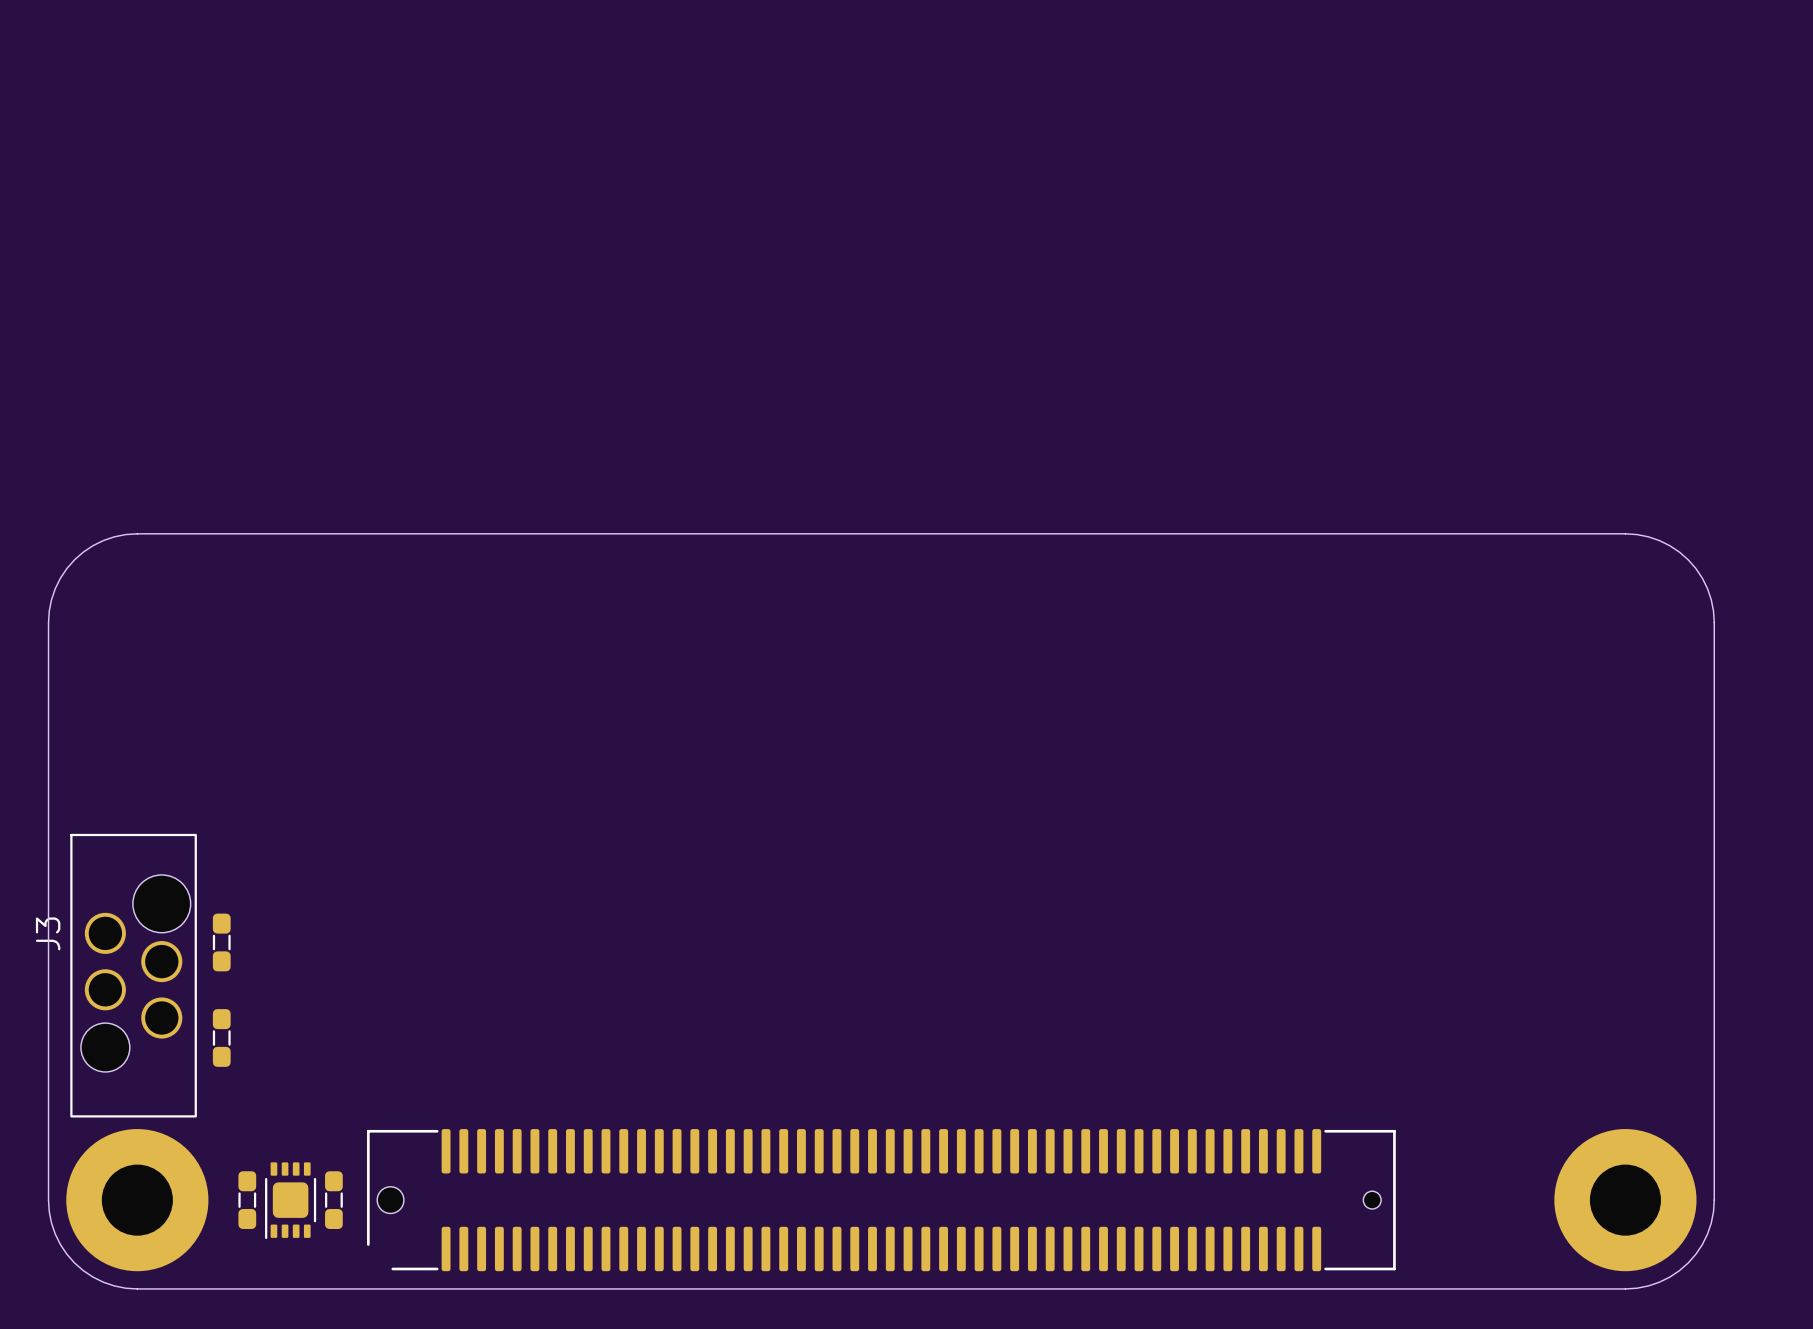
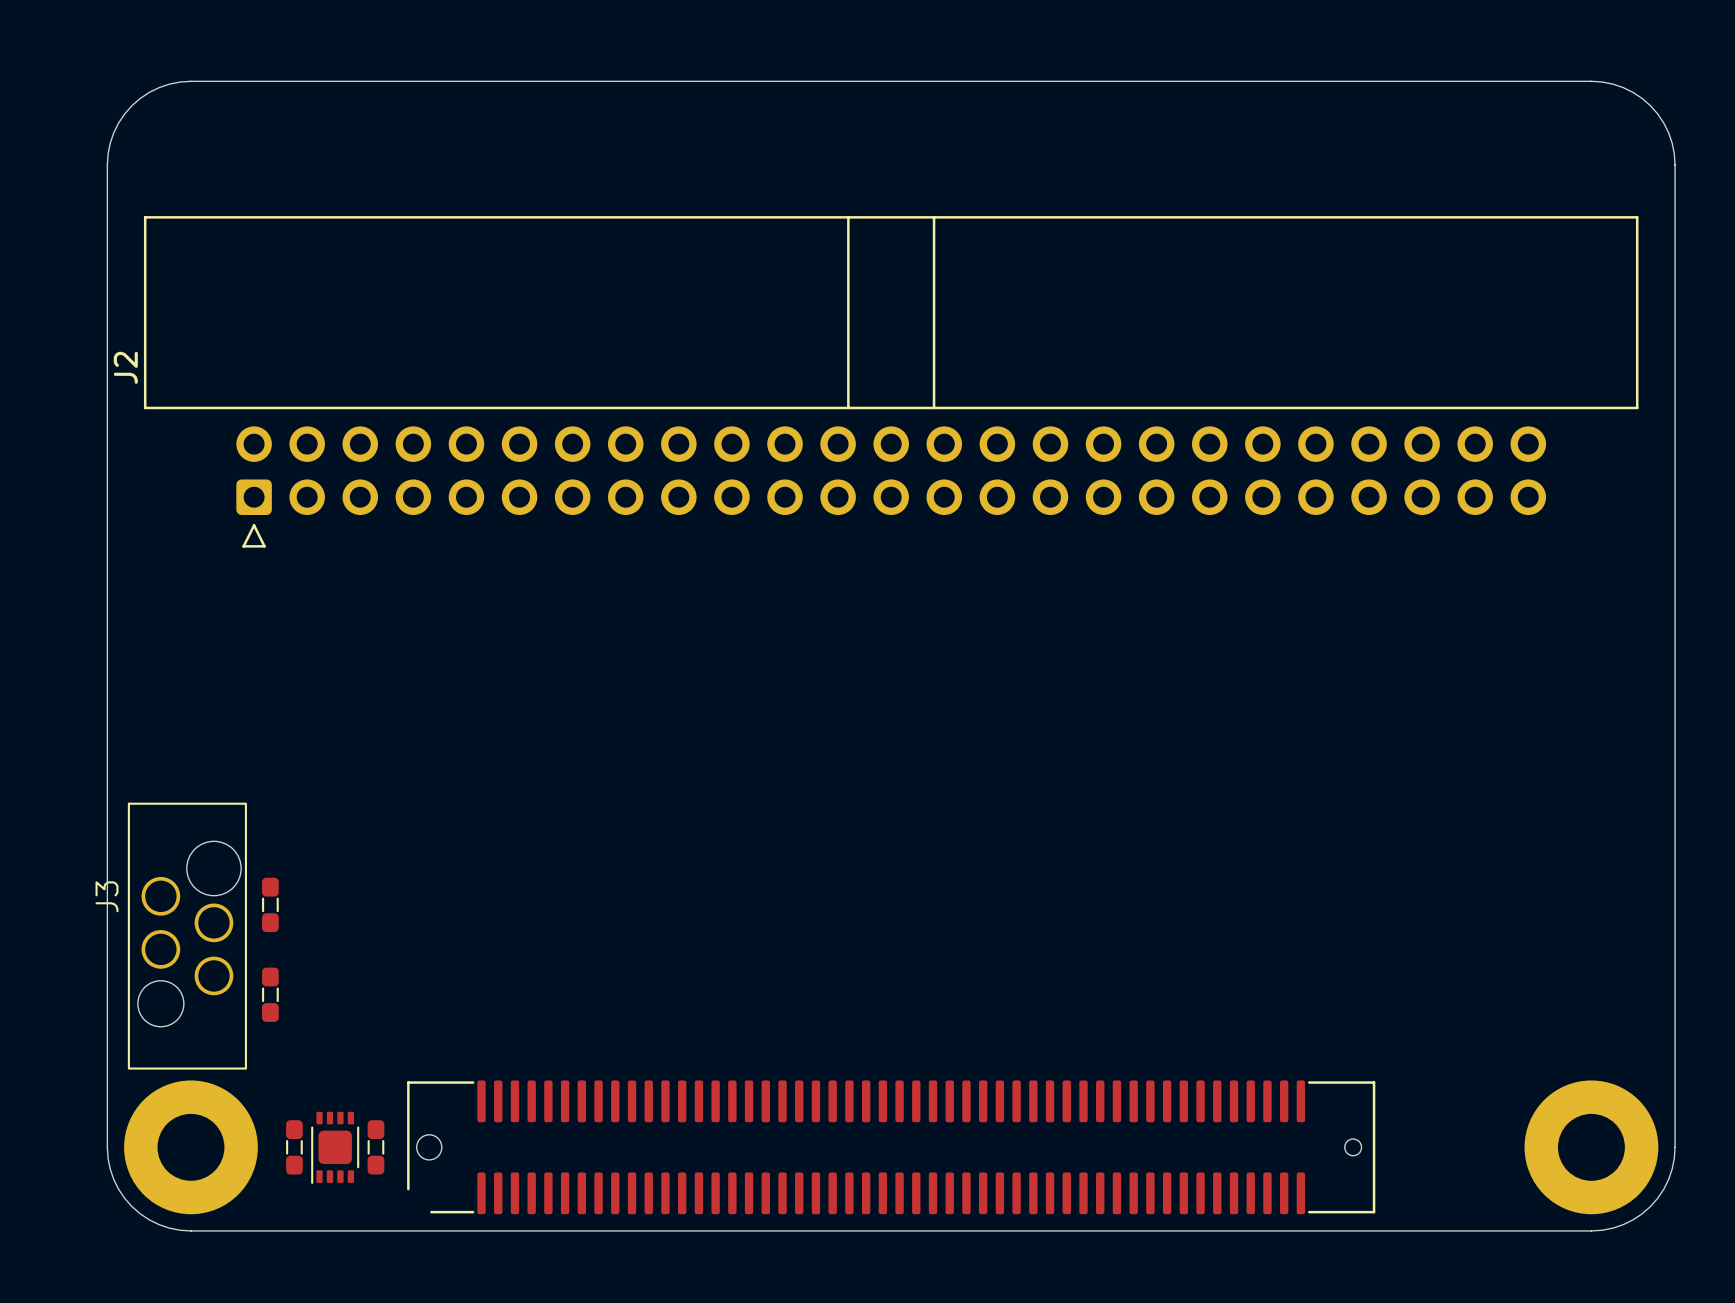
J2: none -> (891, 381)
board edge: (48, 622) (49, 611) (55, 588) (60, 578) (74, 559) (92, 545) (103, 540) (125, 534) (137, 533) (1625, 533) (1637, 534) (1659, 540) (1669, 545) (1688, 559) (1702, 578) (1707, 588) (1713, 611) (1714, 622) -> (107, 603) (108, 154) (118, 123) (131, 105) (158, 87) (190, 81) (1591, 81) (1623, 87) (1642, 98) (1657, 114) (1668, 132) (1674, 154) (1675, 603)

